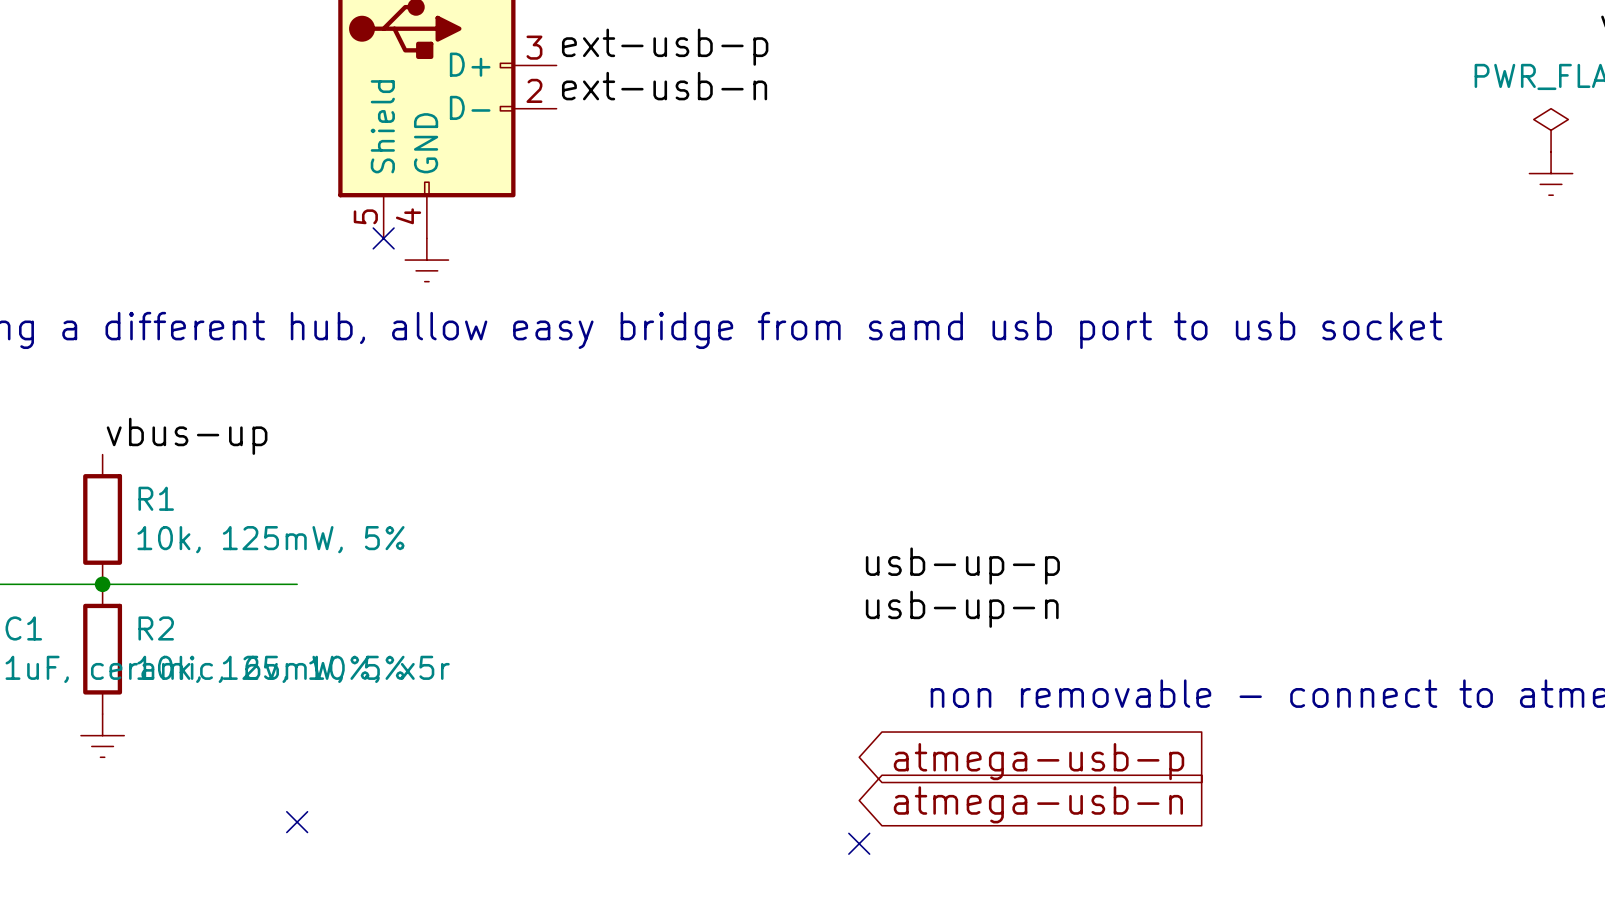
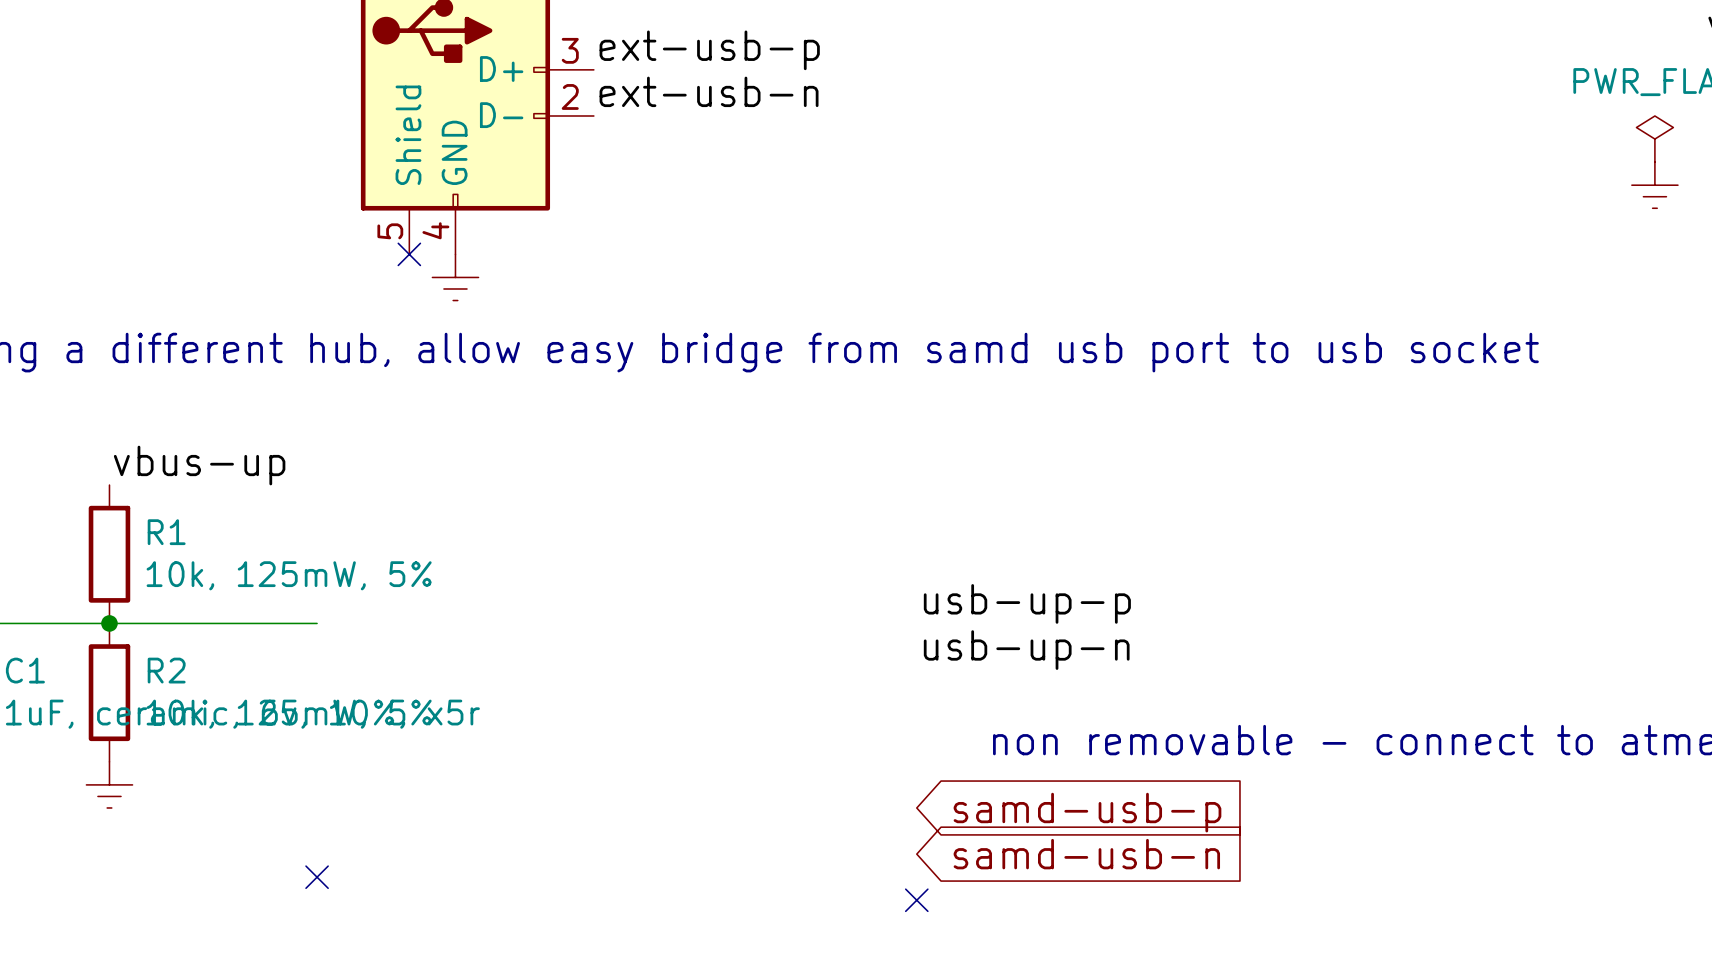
global label: atmega-usb-p (1039, 761) -> samd-usb-p (1087, 812)
global label: atmega-usb-n (1038, 804) -> samd-usb-n (1086, 854)

